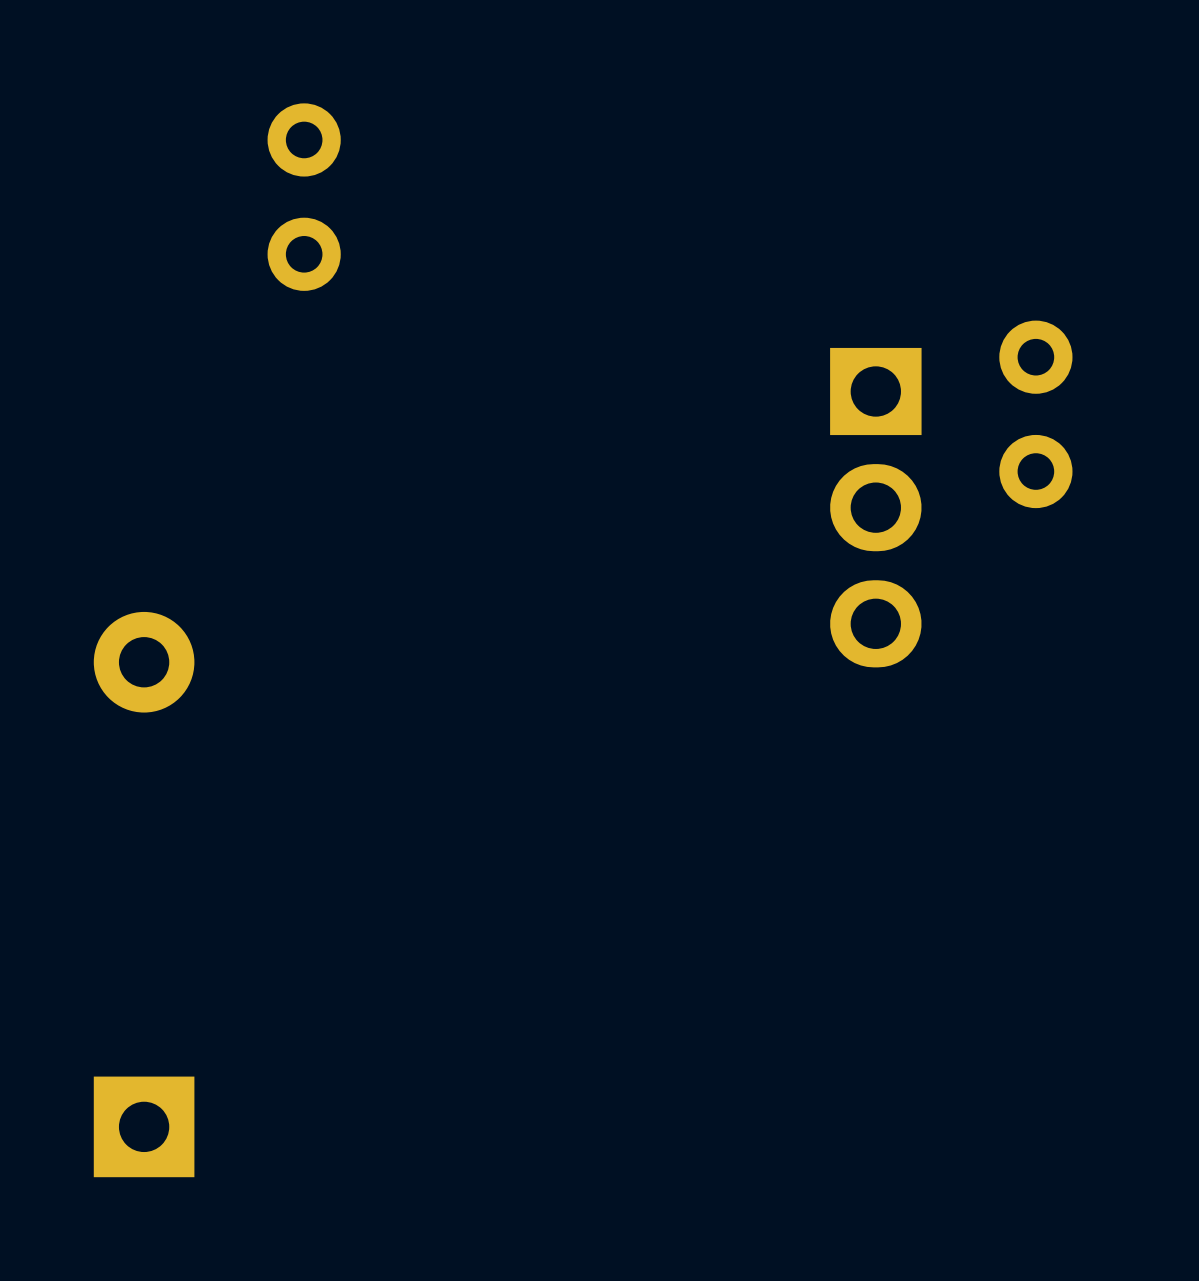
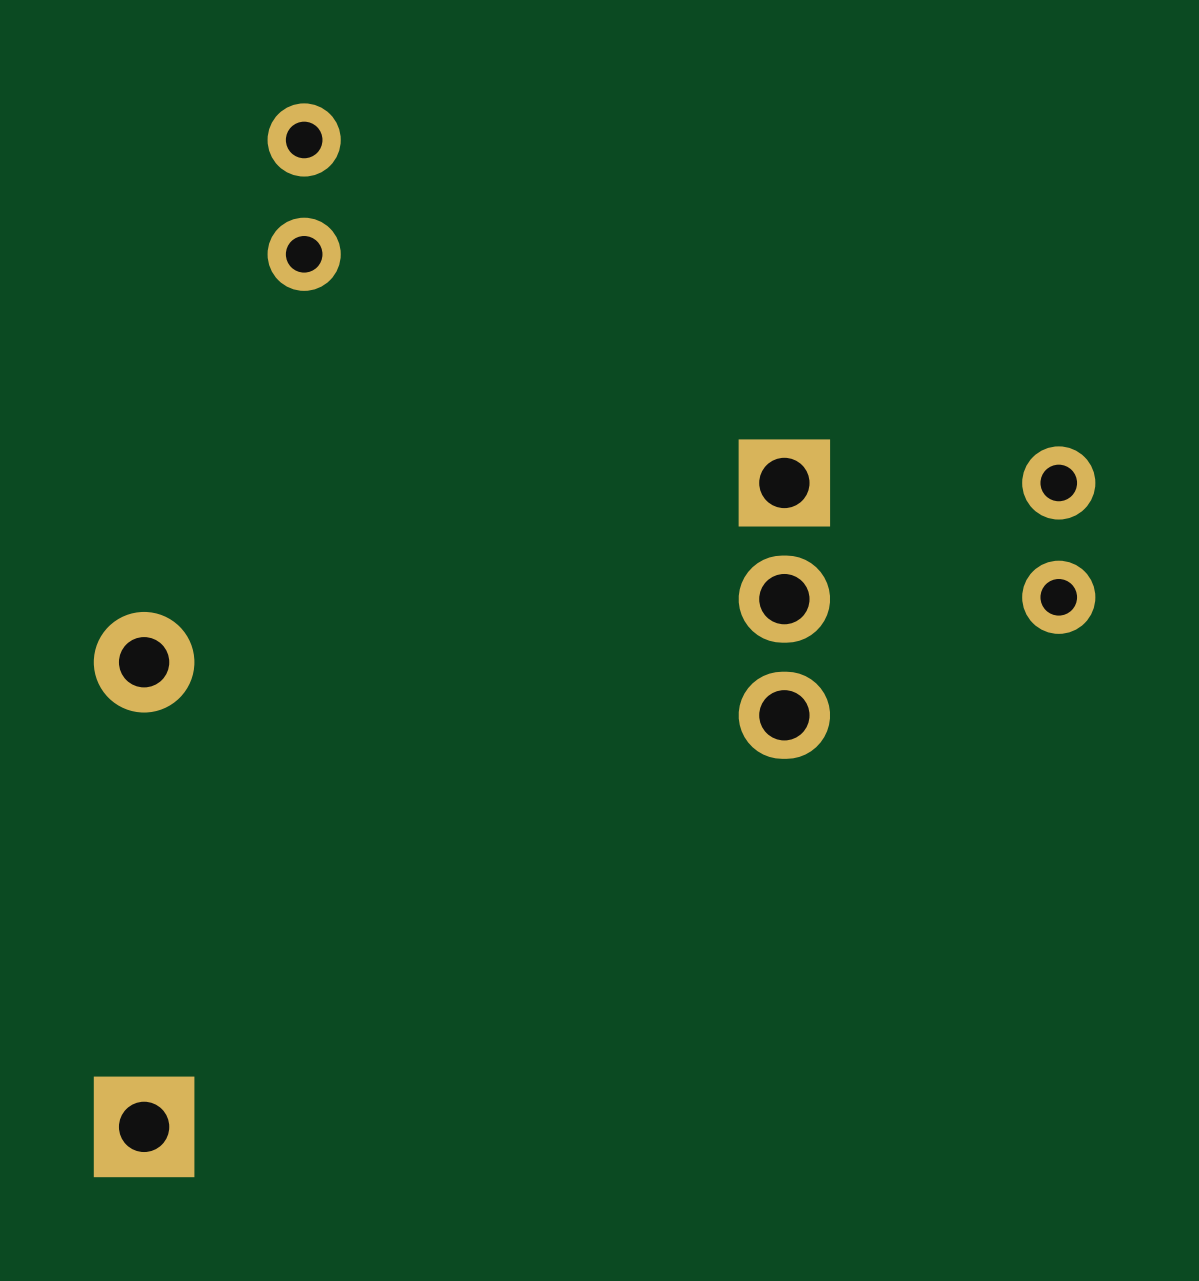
part position: (1035, 414) -> (1058, 540)
part position: (875, 507) -> (784, 599)

